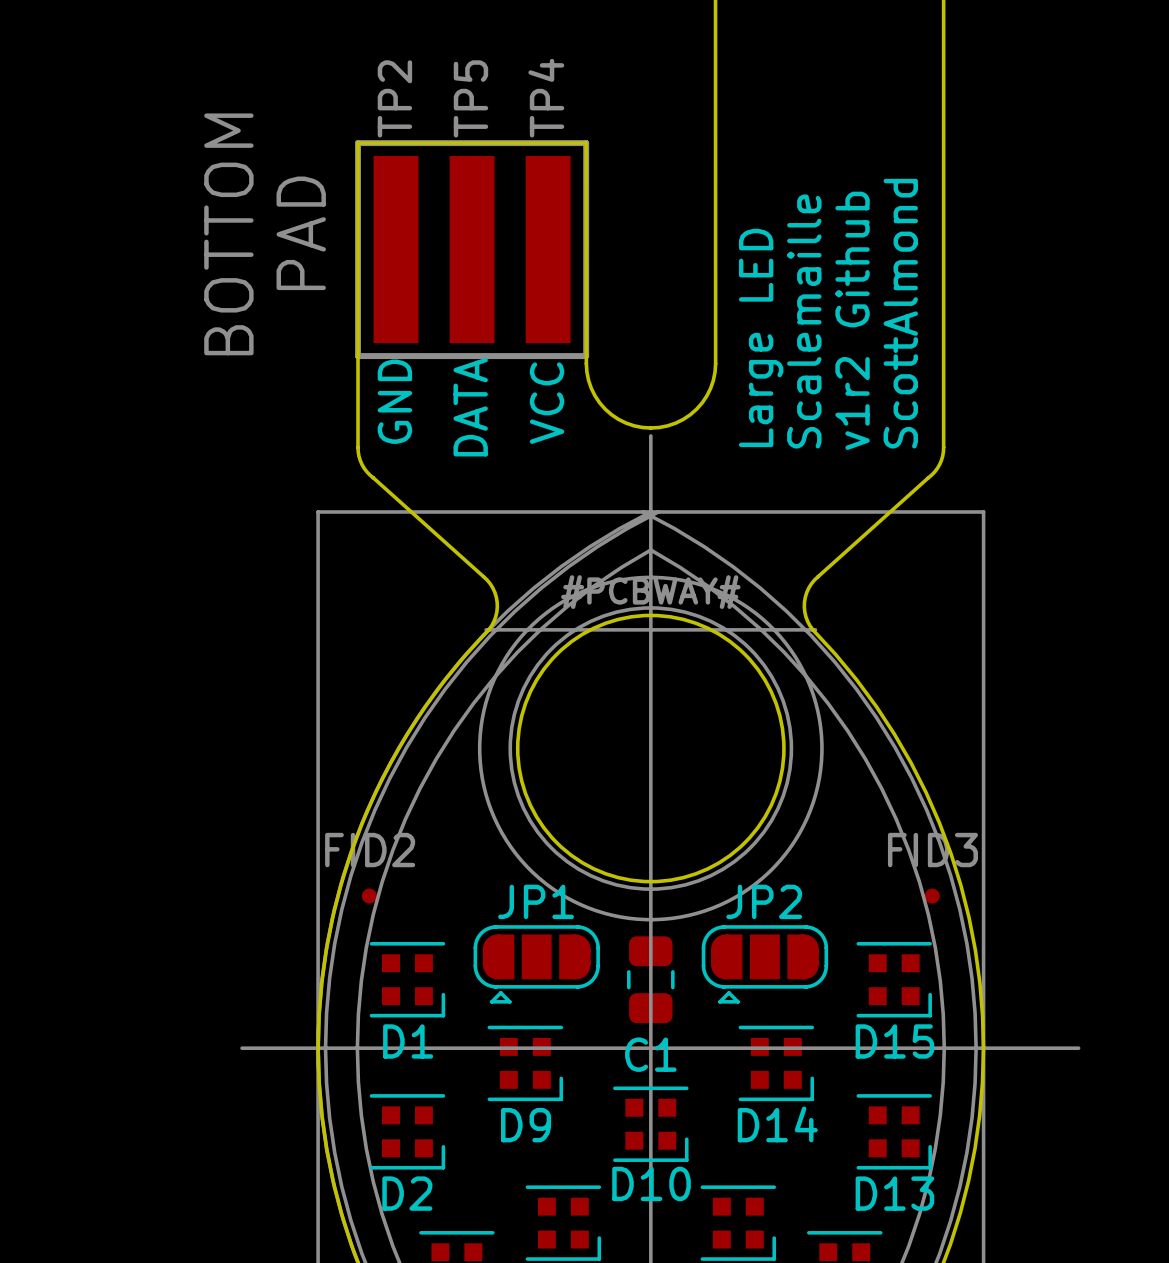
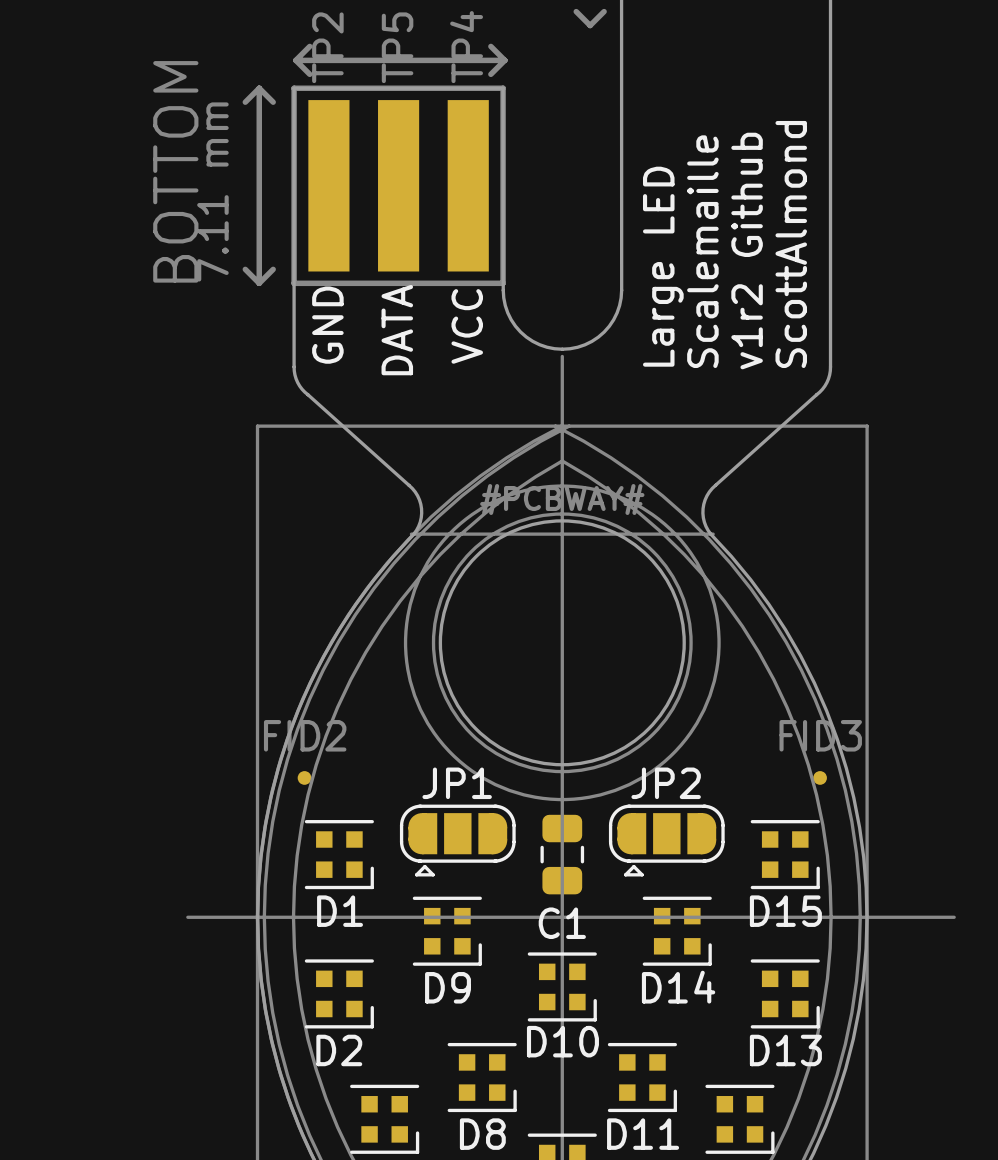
line: none -> (576, 11) (590, 25) (604, 11)
line: none -> (309, 46) (295, 60) (309, 74)
line: none -> (490, 46) (504, 60)
line: none -> (299, 60) (504, 60)
line: none -> (504, 60) (490, 74)
line: none -> (259, 88) (259, 283)
line: none -> (259, 88) (245, 102)
line: none -> (259, 88) (273, 102)
text: PAD (301, 233) -> none
text: none -> 7.11 mm (212, 191)
line: none -> (245, 269) (259, 283)
line: none -> (273, 269) (259, 283)

